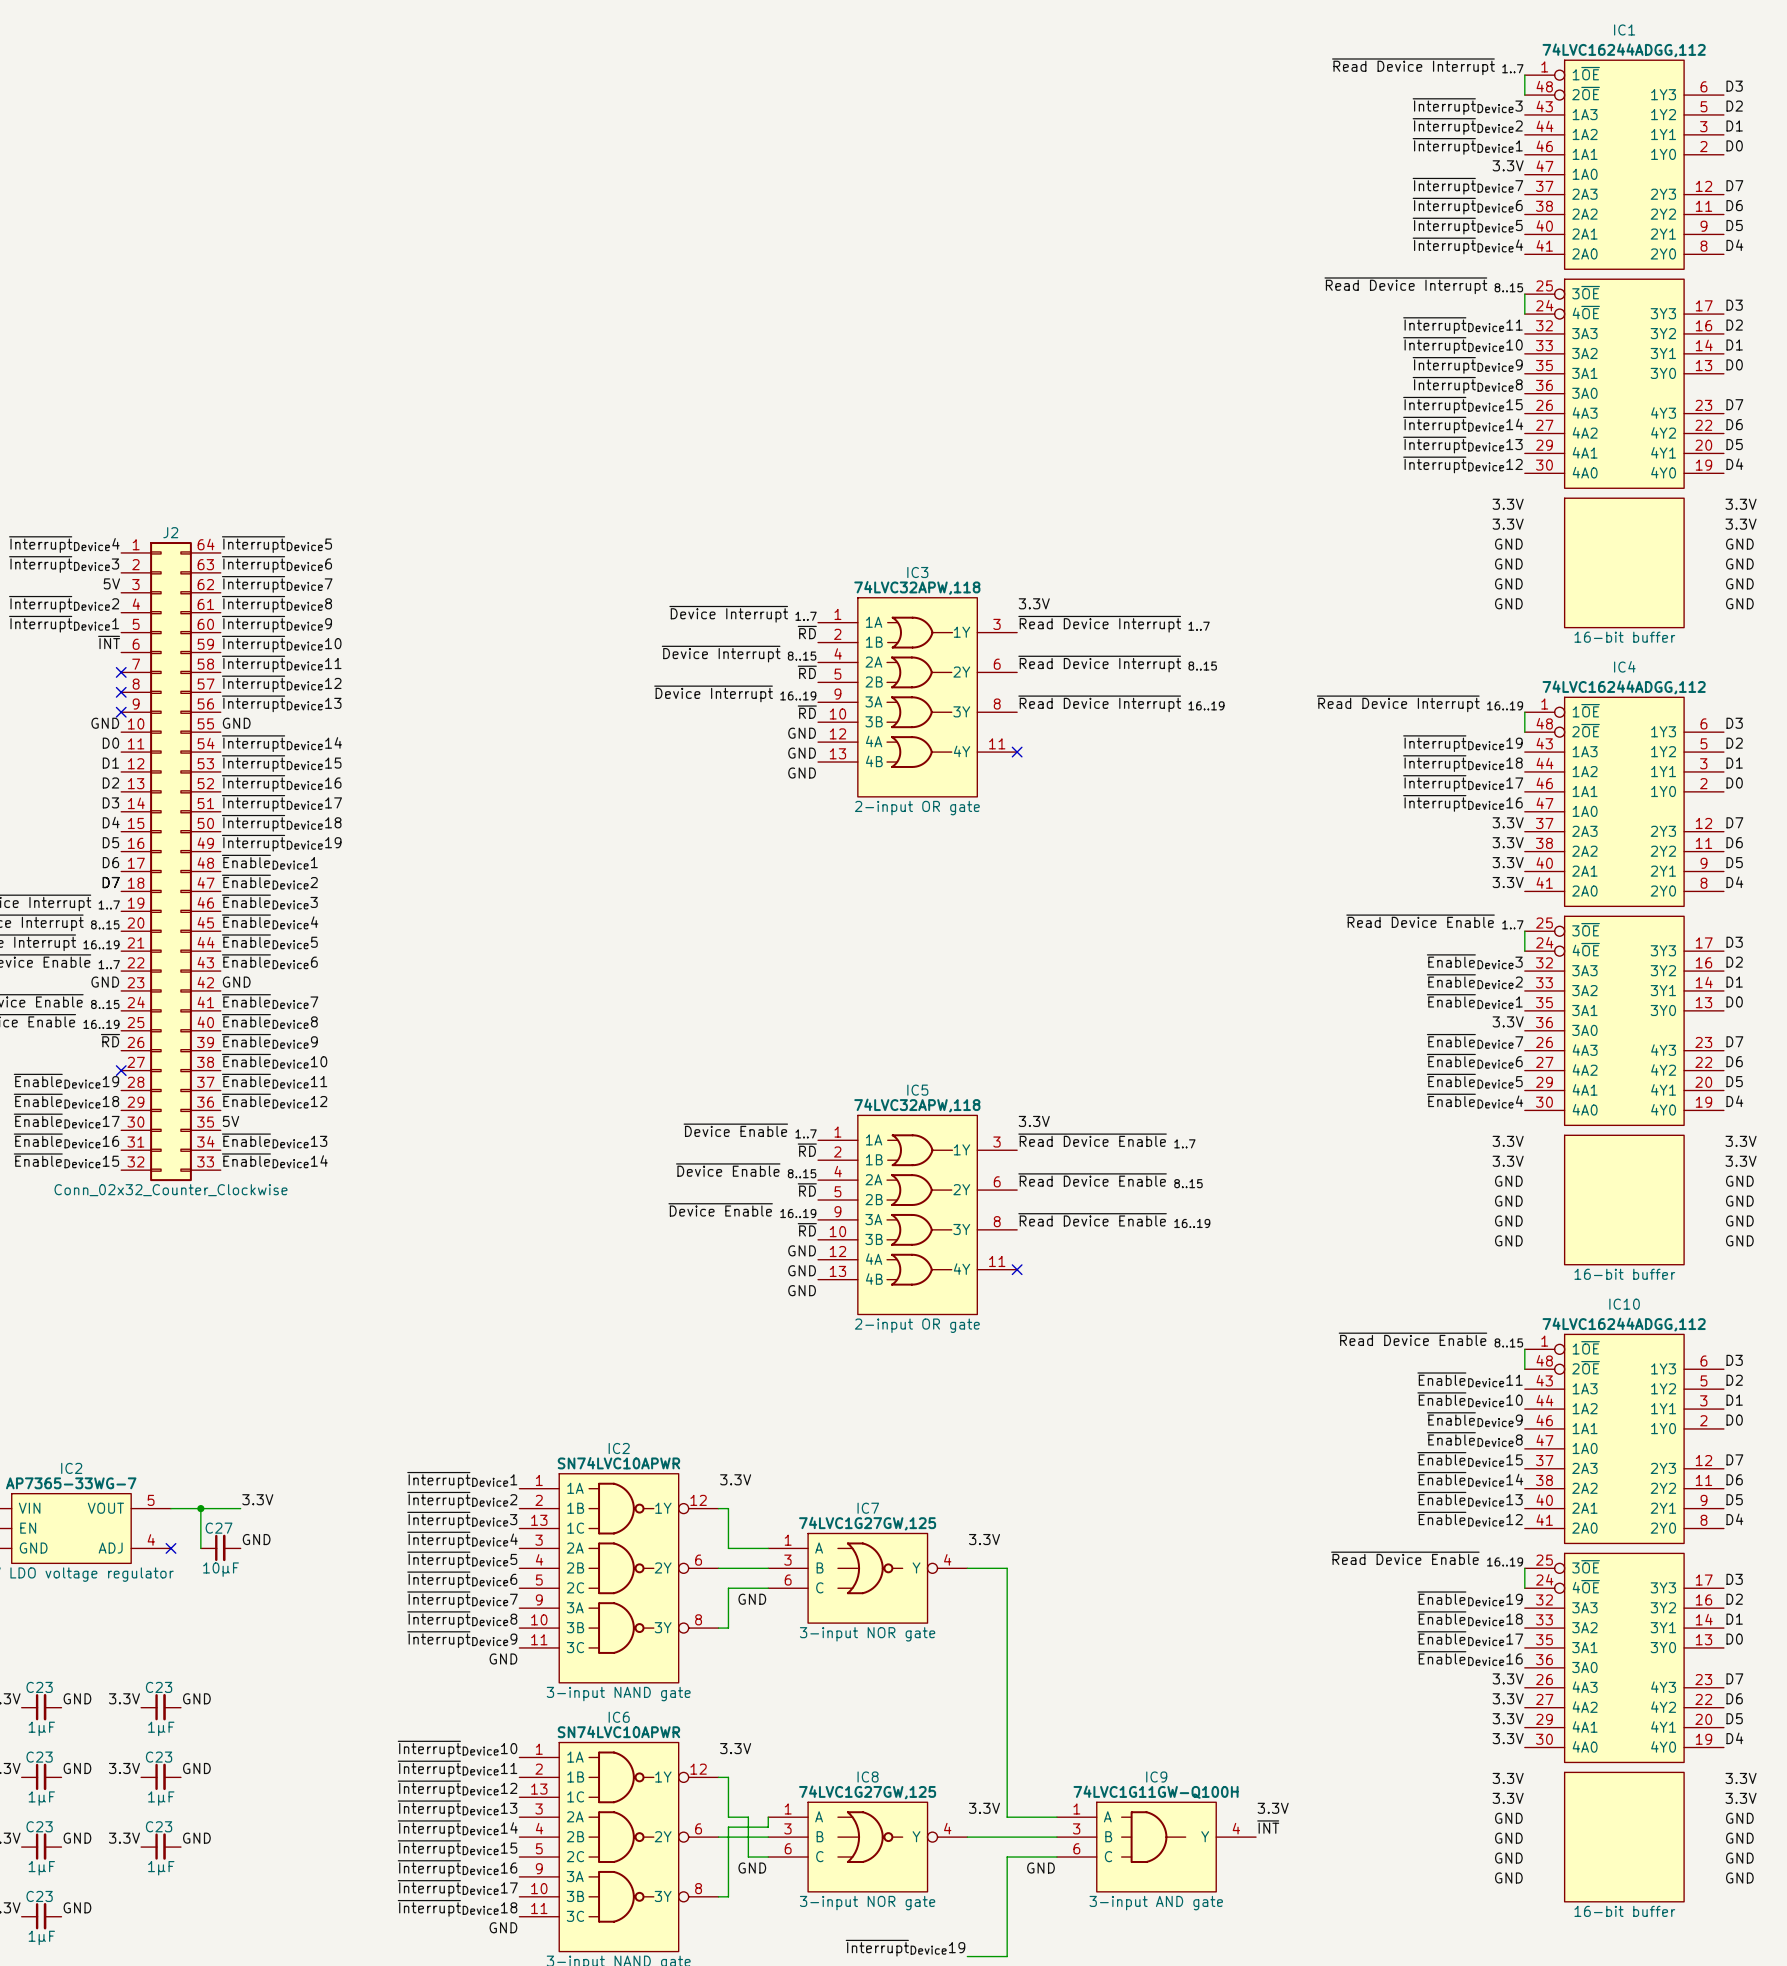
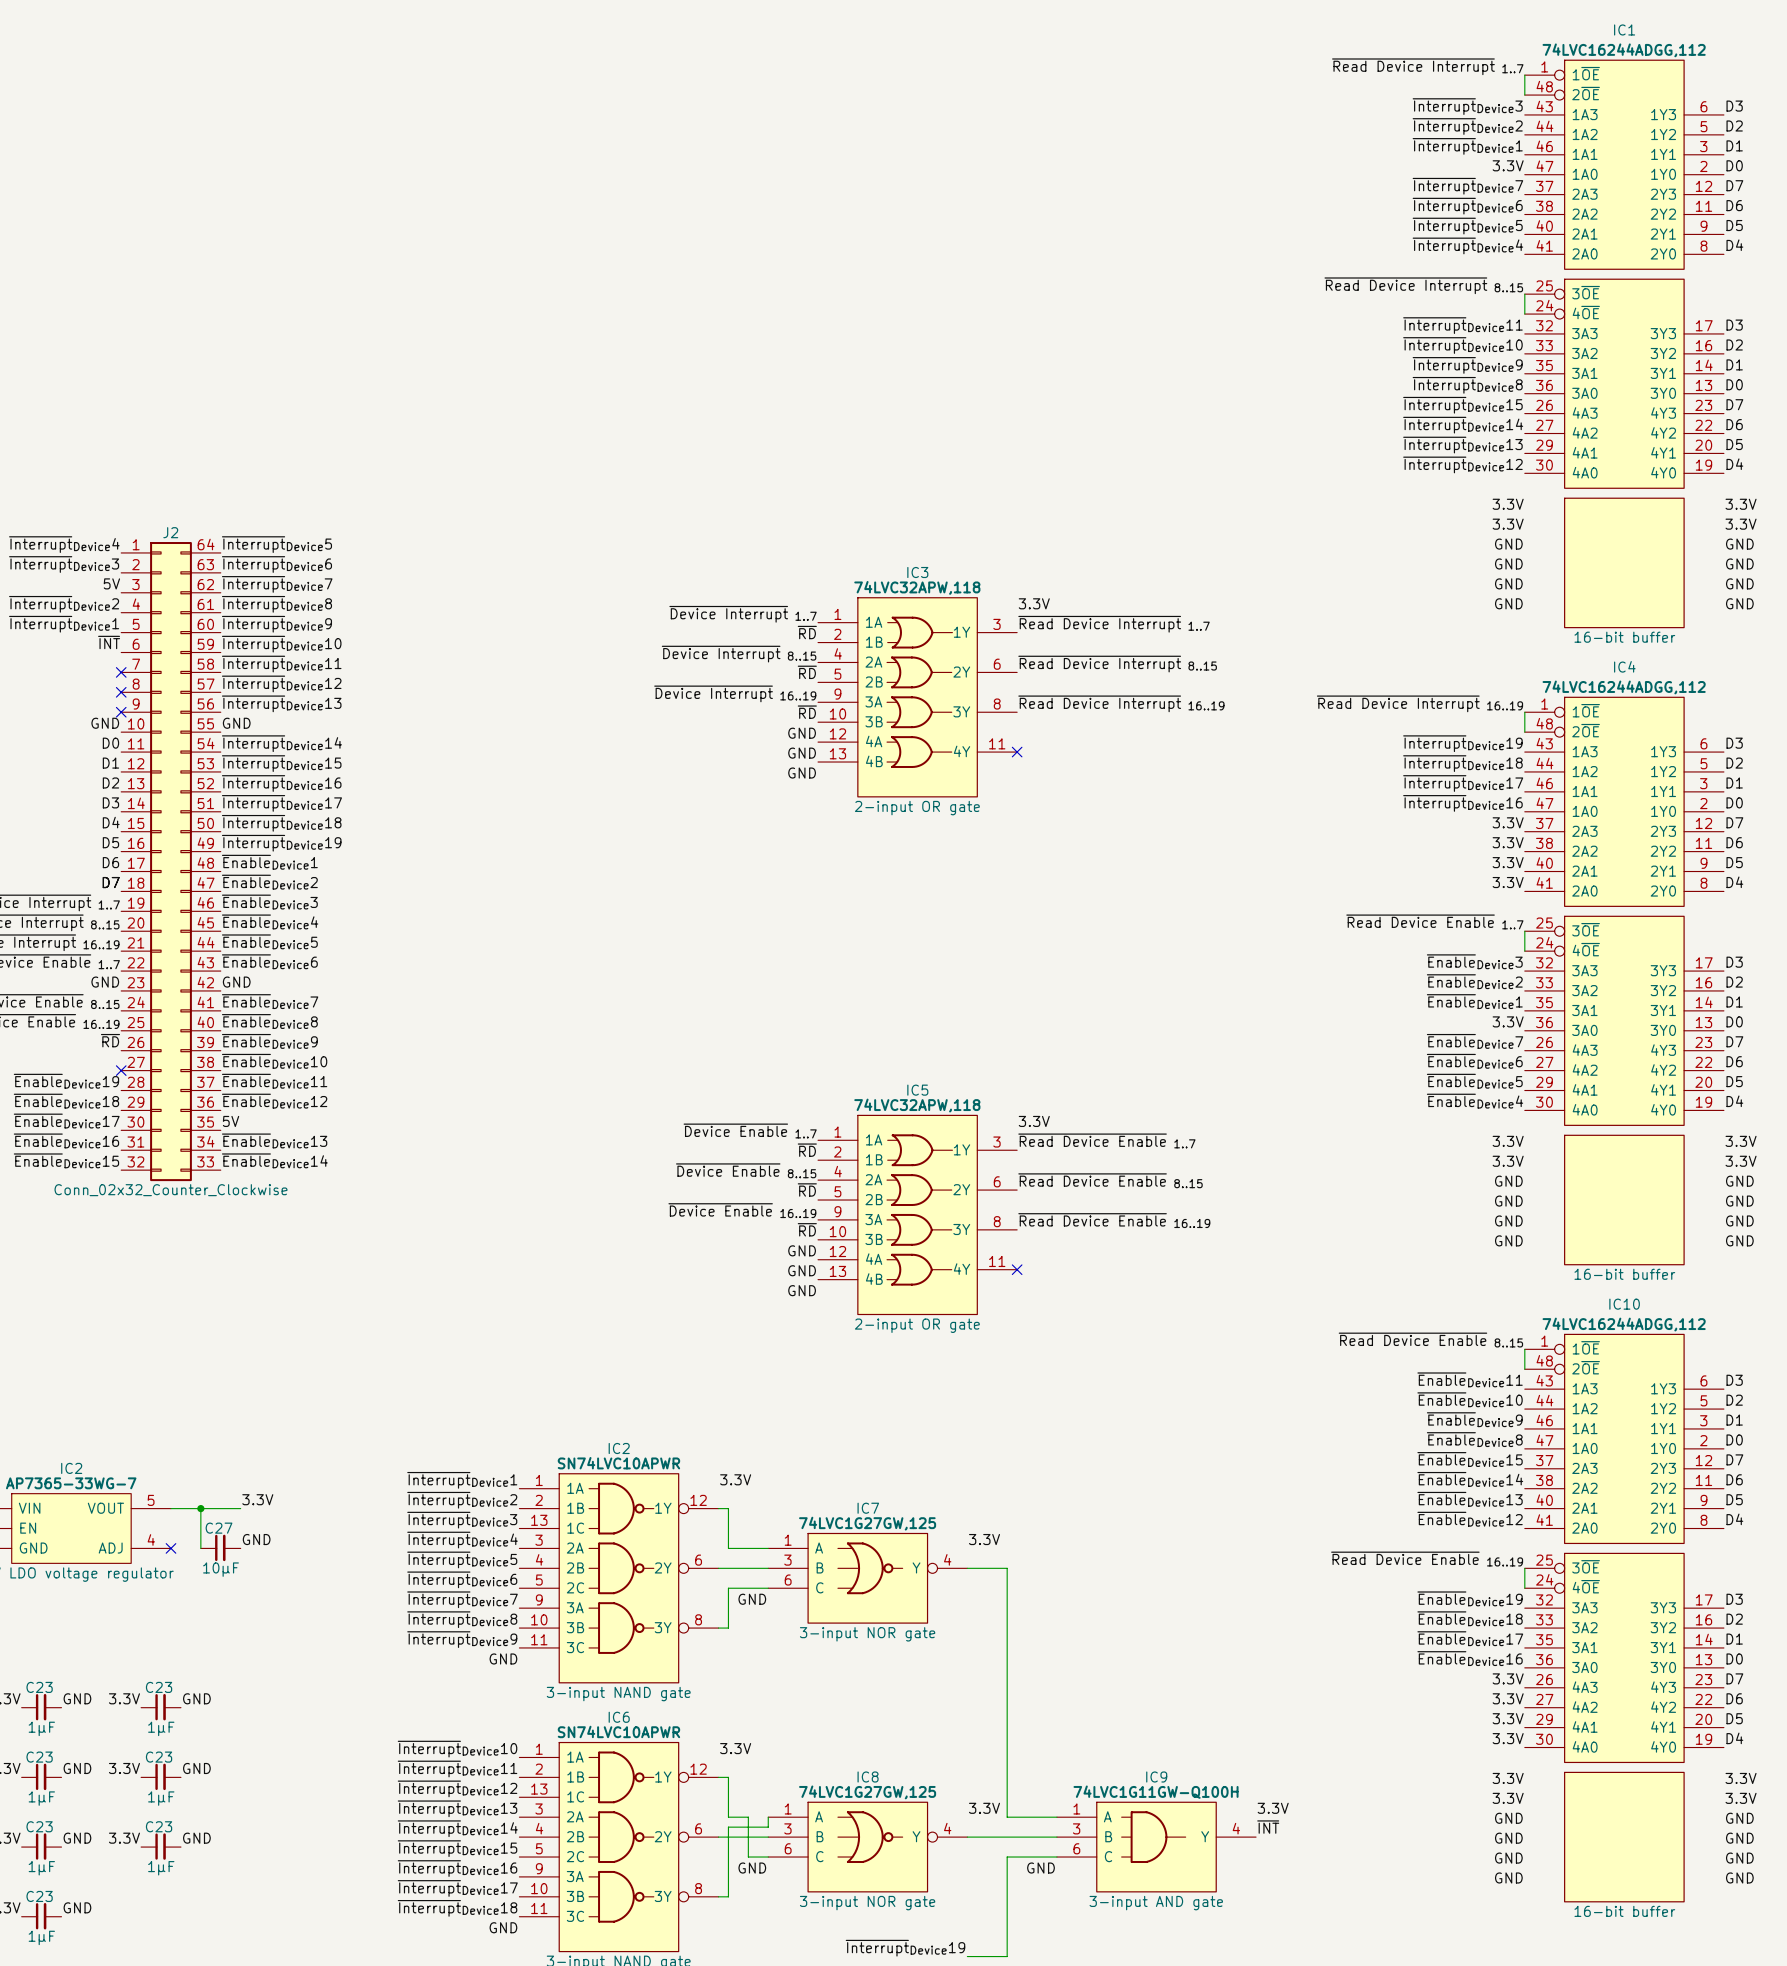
IC1 symbol: [1524, 59, 1724, 629] -> [1524, 59, 1724, 629]
label: D3 (1734, 86) -> none
label: D2 (1734, 106) -> D3 (1734, 106)
label: D1 (1734, 125) -> D2 (1734, 125)
label: D0 (1734, 145) -> D1 (1734, 145)
label: none -> D0 (1734, 165)
label: D3 (1734, 305) -> none
label: D2 (1734, 325) -> D3 (1734, 325)
label: D1 (1734, 344) -> D2 (1734, 344)
label: D0 (1734, 364) -> D1 (1734, 364)
label: none -> D0 (1734, 384)
IC4 symbol: [1524, 696, 1724, 1266] -> [1524, 696, 1724, 1266]
label: D3 (1734, 723) -> none
label: D2 (1734, 743) -> D3 (1734, 743)
label: D1 (1734, 763) -> D2 (1734, 763)
label: D0 (1734, 782) -> D1 (1734, 782)
label: none -> D0 (1734, 802)
label: D3 (1734, 942) -> none
label: D2 (1734, 962) -> D3 (1734, 962)
label: D1 (1734, 982) -> D2 (1734, 982)
label: D0 (1734, 1001) -> D1 (1734, 1001)
label: none -> D0 (1734, 1021)
IC10 symbol: [1524, 1333, 1724, 1903] -> [1524, 1333, 1724, 1903]
label: D3 (1734, 1360) -> none
label: D2 (1734, 1380) -> D3 (1734, 1380)
label: D1 (1734, 1400) -> D2 (1734, 1400)
label: D0 (1734, 1420) -> D1 (1734, 1420)
label: none -> D0 (1734, 1439)
label: D3 (1734, 1579) -> none
label: D2 (1734, 1599) -> D3 (1734, 1599)
label: D1 (1734, 1619) -> D2 (1734, 1619)
label: D0 (1734, 1639) -> D1 (1734, 1639)
label: none -> D0 (1734, 1658)

